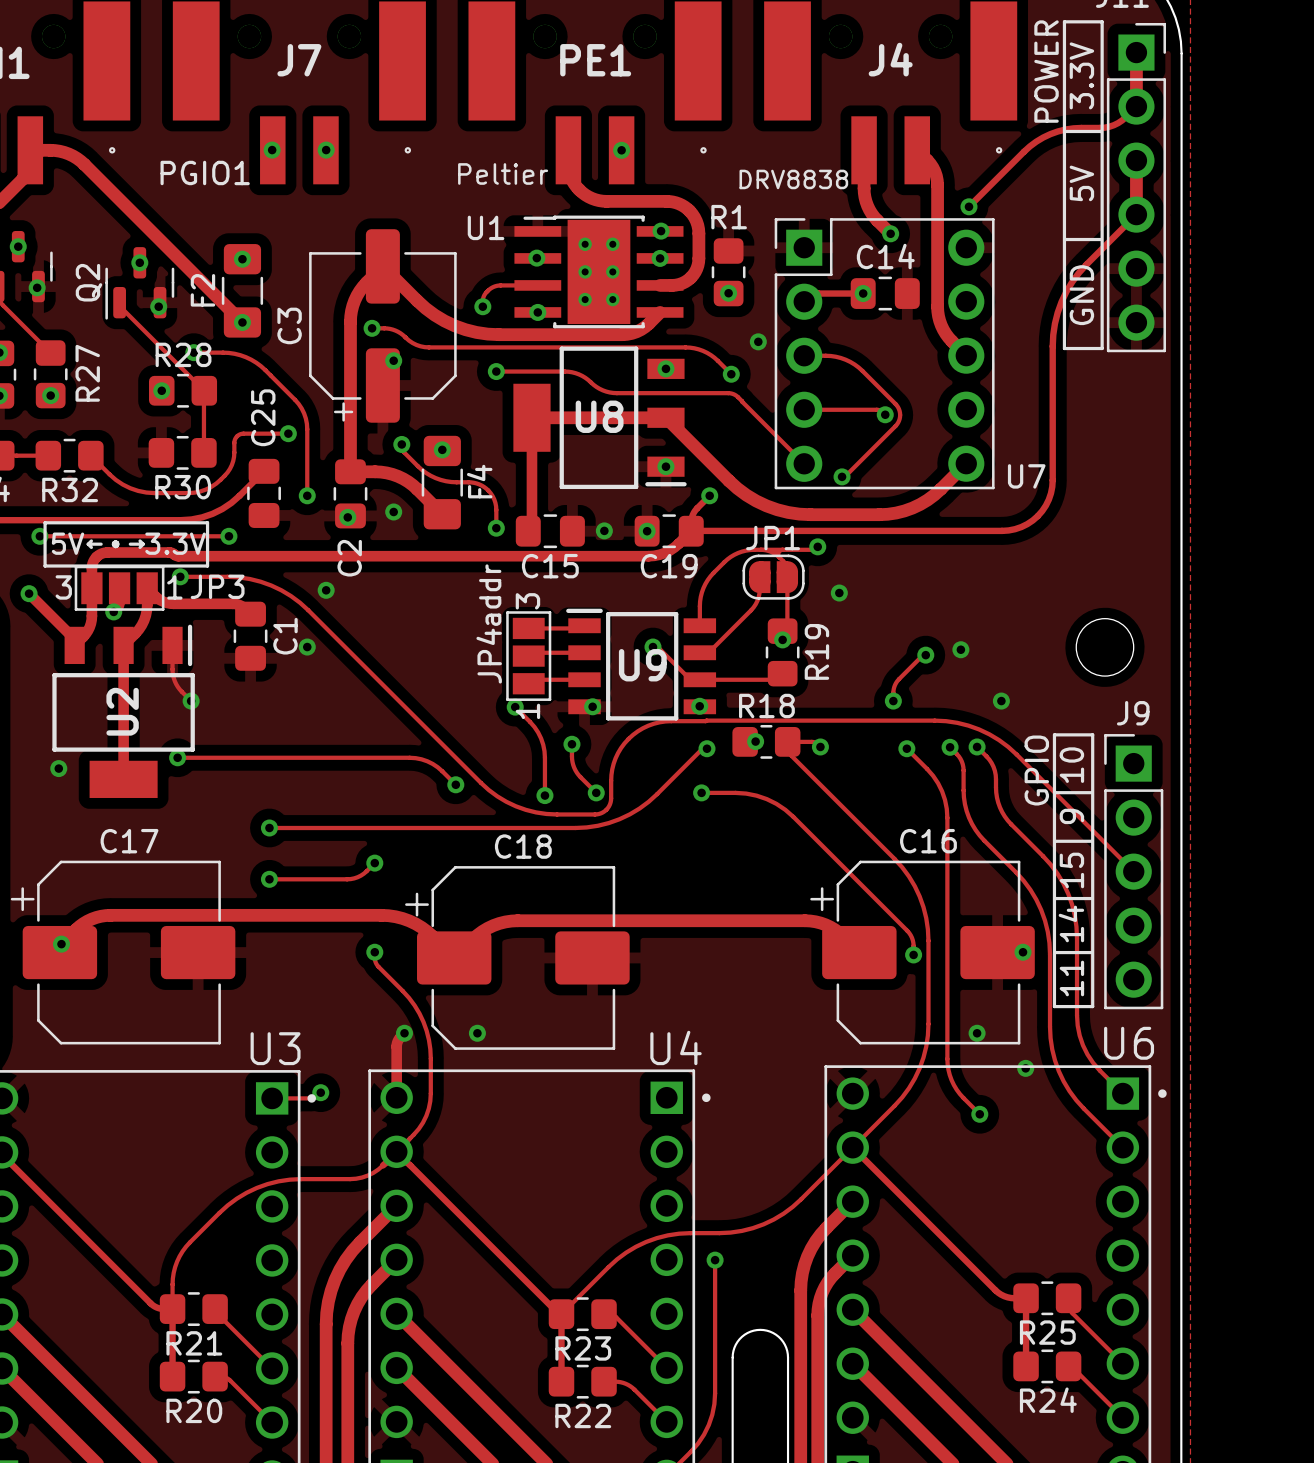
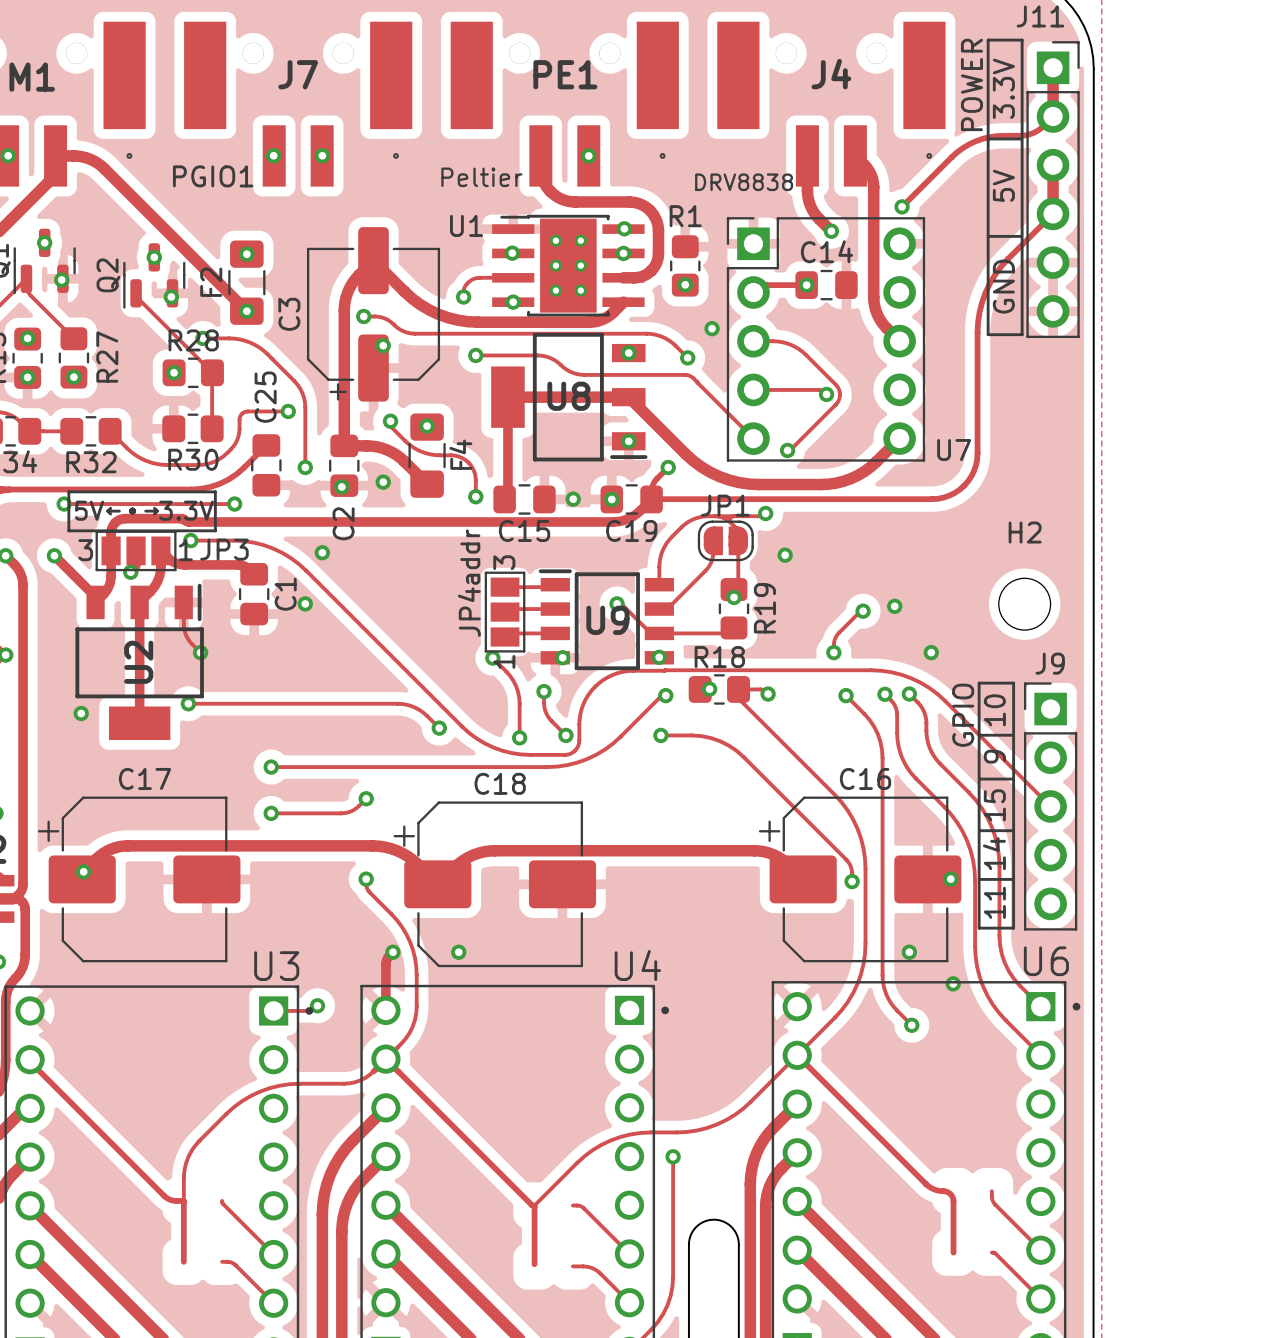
H2 name: none -> H2 (1025, 532)
R25: (1047, 1298) -> none
R21: (193, 1309) -> none
R23: (582, 1314) -> none
R24: (1047, 1366) -> none
R20: (193, 1376) -> none
R22: (582, 1381) -> none

